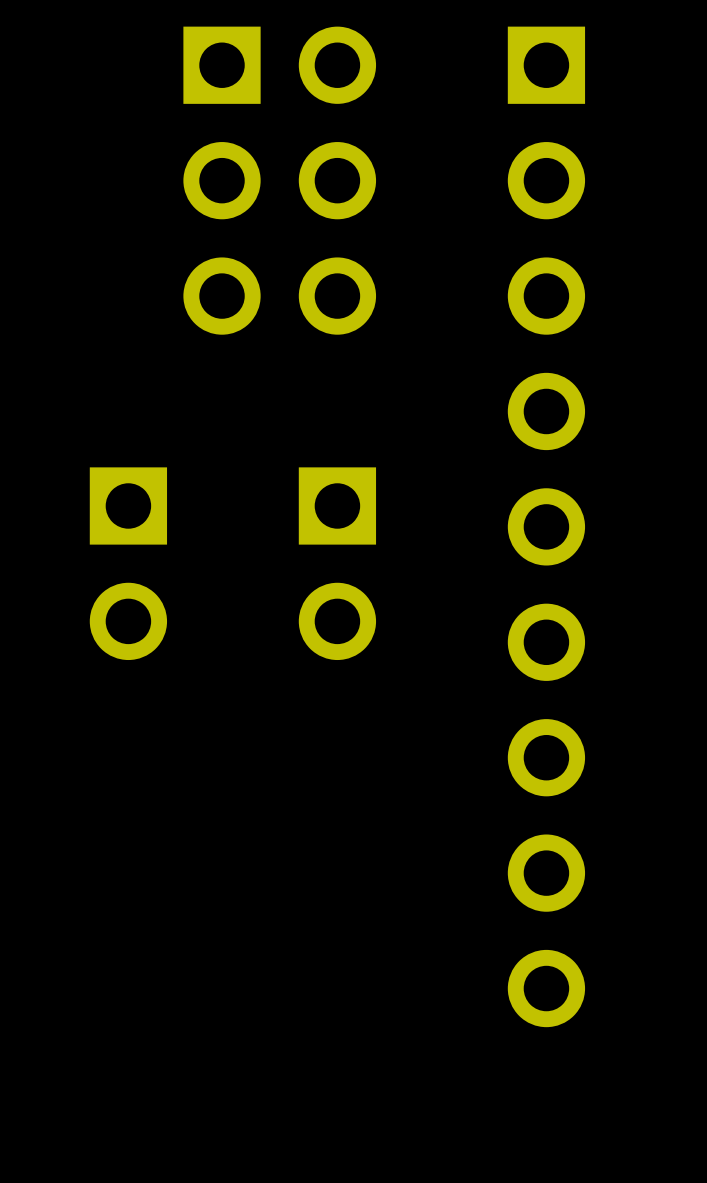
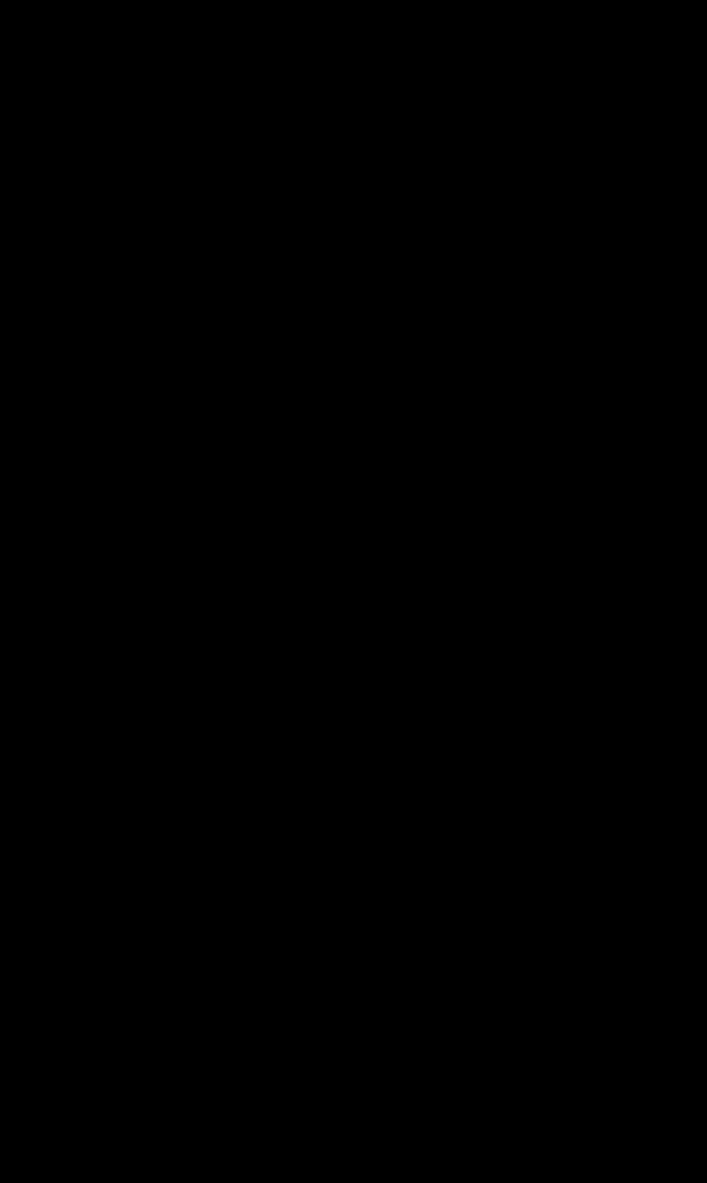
part: (279, 180) -> none
part: (546, 526) -> none
part: (128, 563) -> none
part: (337, 563) -> none

